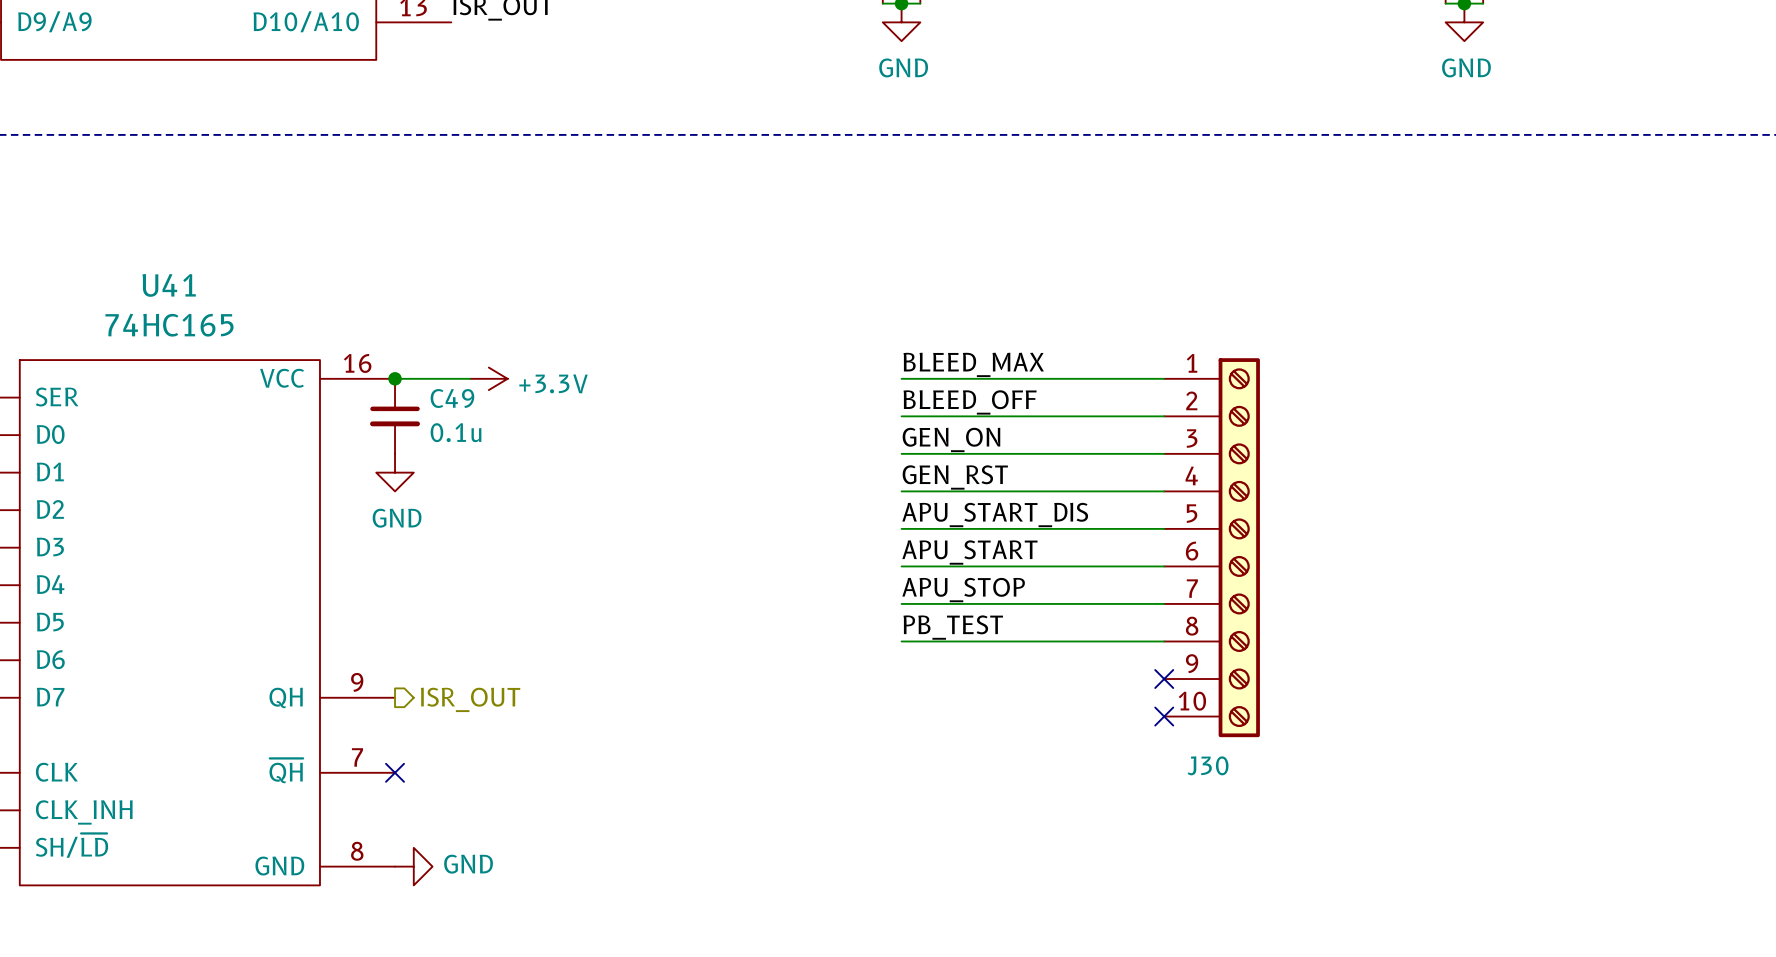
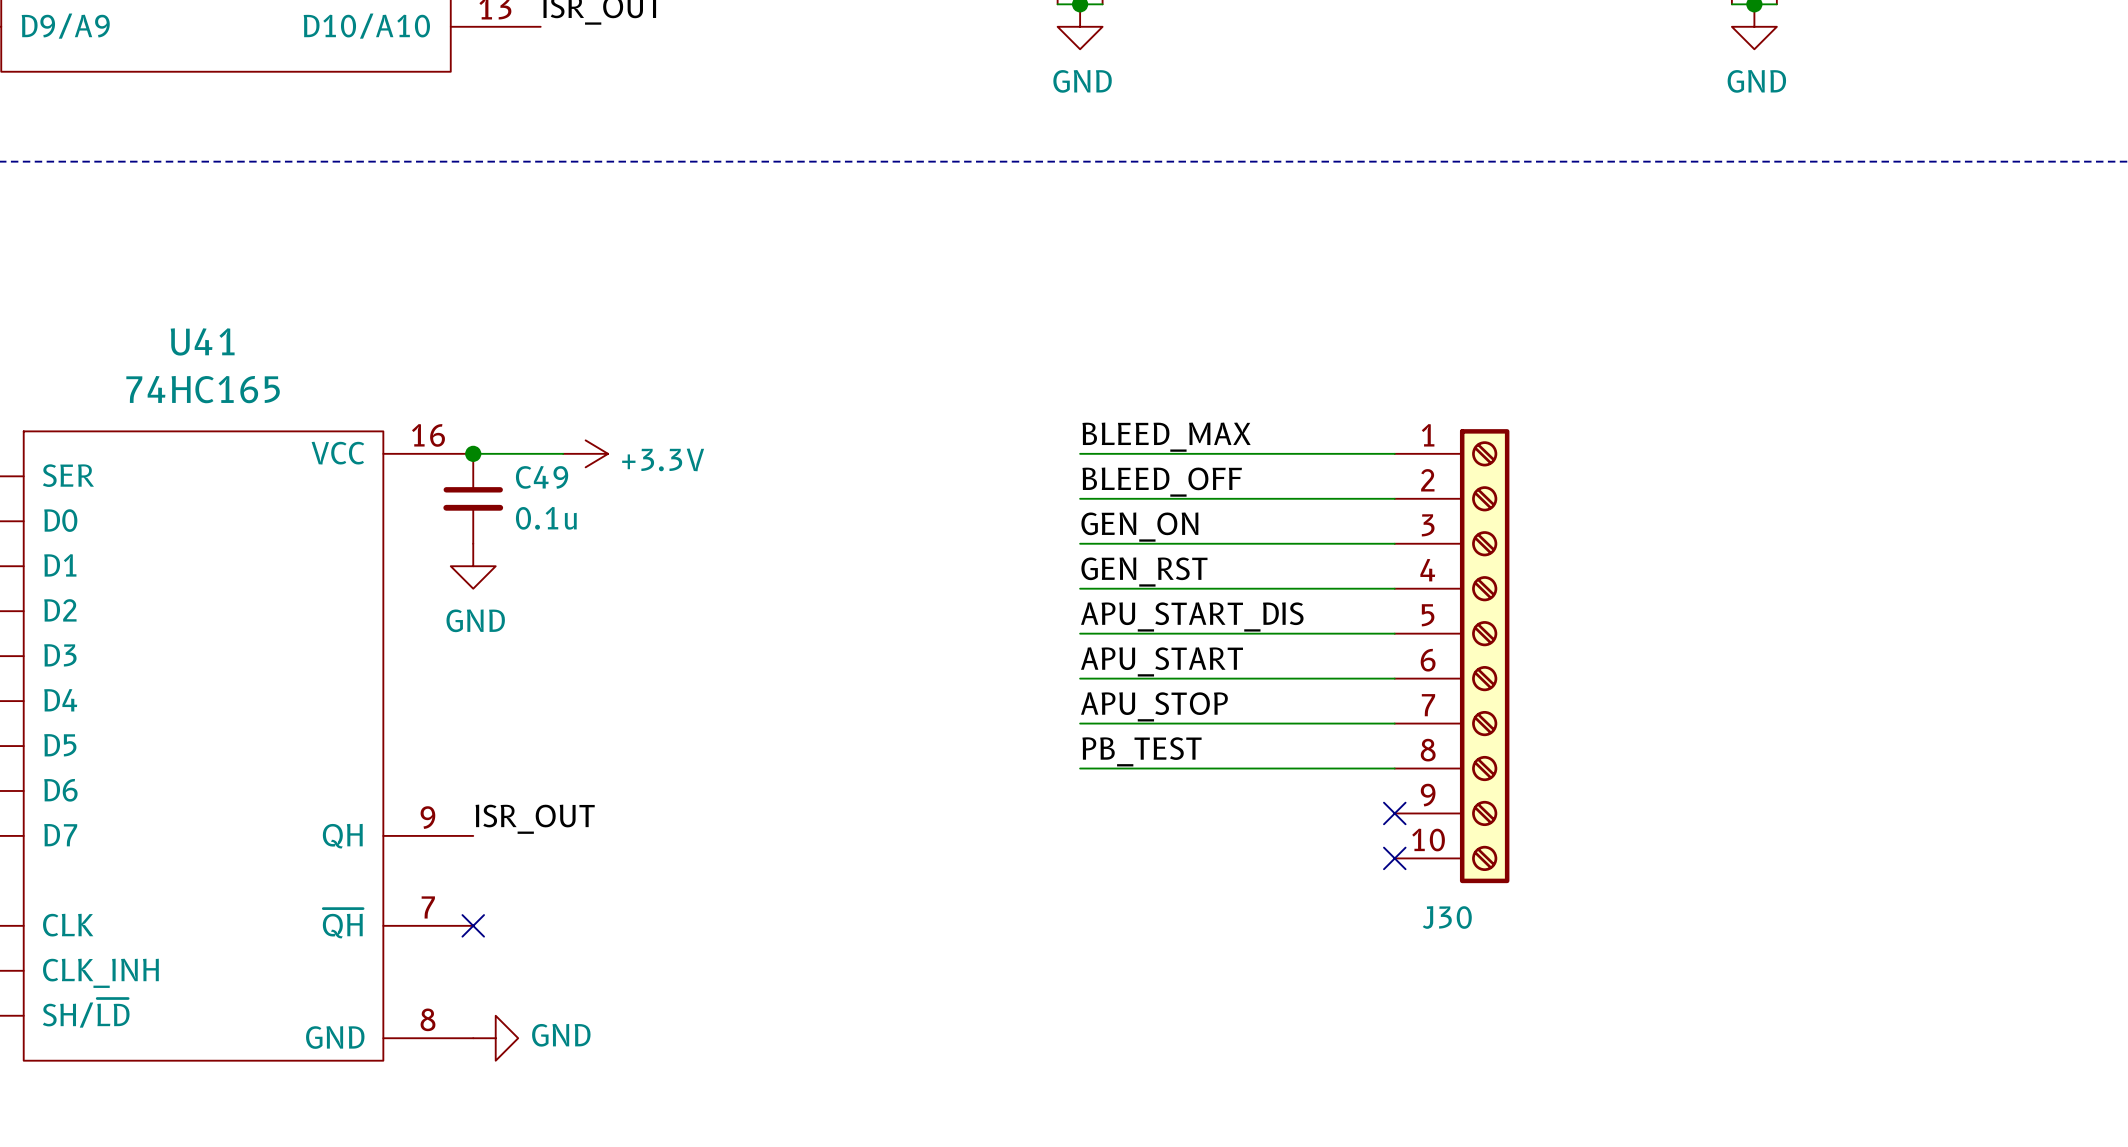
label: none -> ISR_OUT (535, 819)
hierarchical label: ISR_OUT (470, 699) -> none

